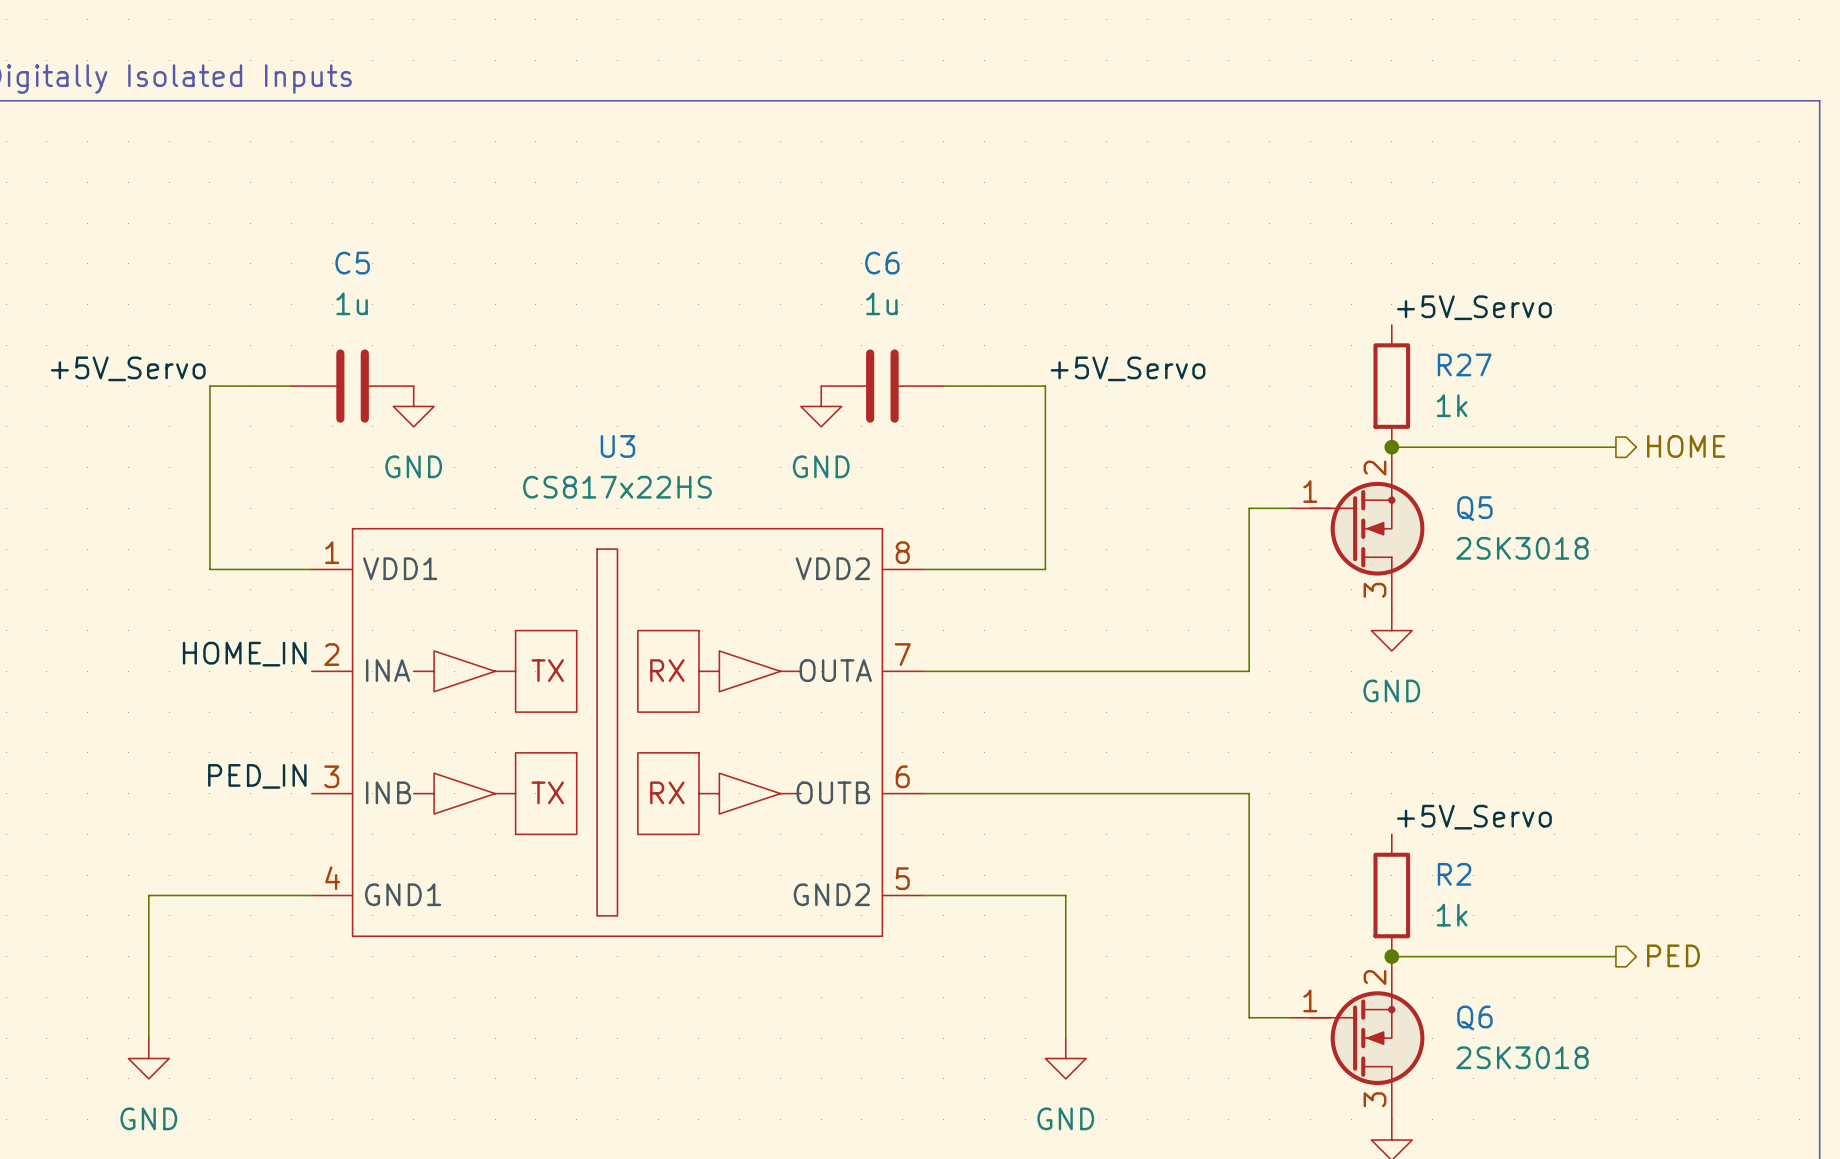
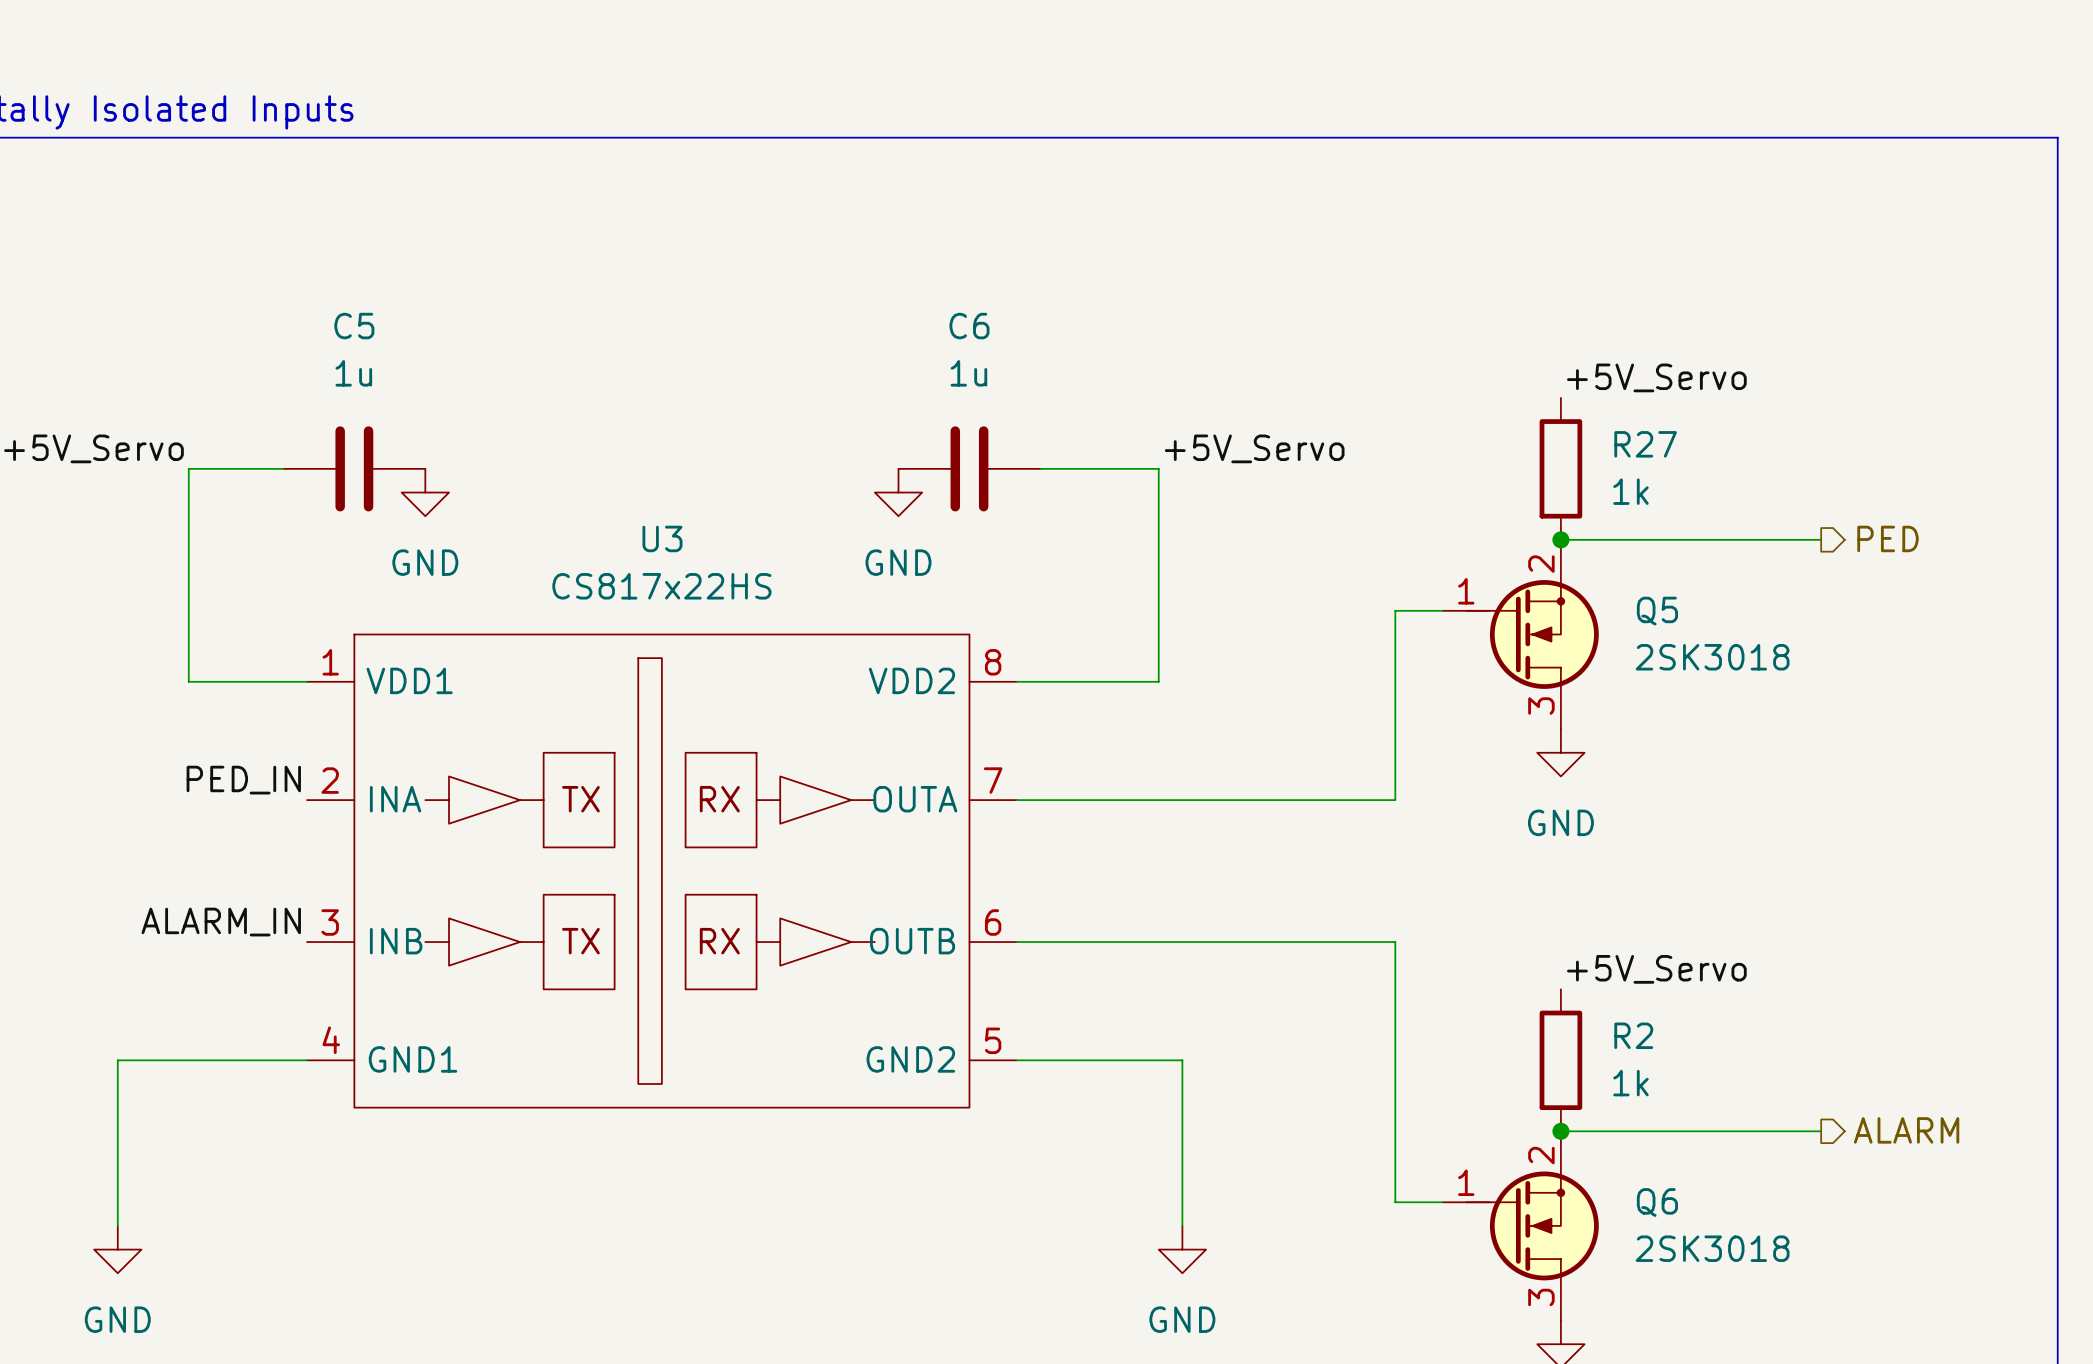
hierarchical label: HOME (1686, 446) -> PED (1888, 538)
label: HOME_IN (244, 654) -> PED_IN (243, 780)
label: PED_IN (257, 776) -> ALARM_IN (221, 922)
hierarchical label: PED (1673, 955) -> ALARM (1906, 1130)

